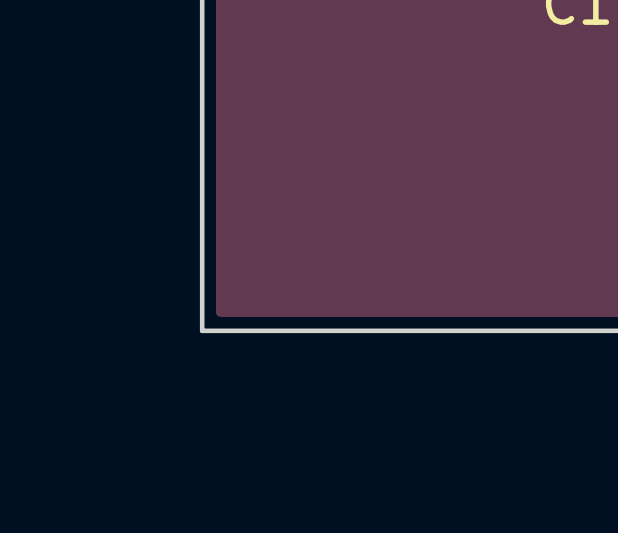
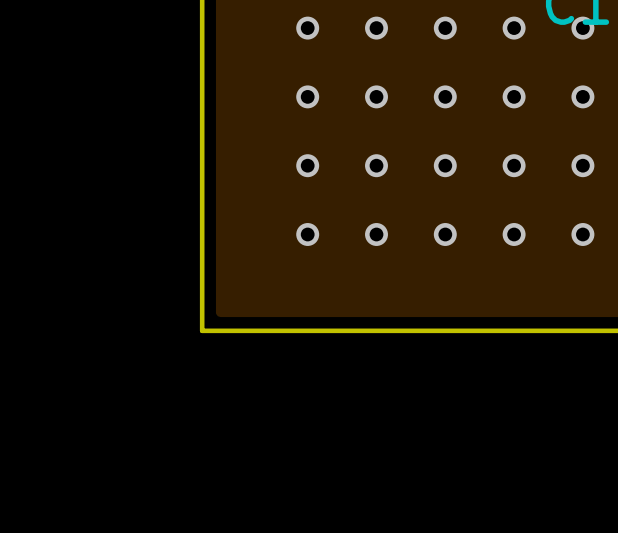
via: none -> (307, 28)
via: none -> (376, 28)
via: none -> (445, 28)
via: none -> (514, 28)
via: none -> (582, 28)
via: none -> (307, 96)
via: none -> (376, 96)
via: none -> (445, 96)
via: none -> (514, 96)
via: none -> (582, 96)
via: none -> (307, 165)
via: none -> (376, 165)
via: none -> (445, 165)
via: none -> (514, 165)
via: none -> (582, 165)
via: none -> (307, 234)
via: none -> (376, 234)
via: none -> (445, 234)
via: none -> (514, 234)
via: none -> (582, 234)

